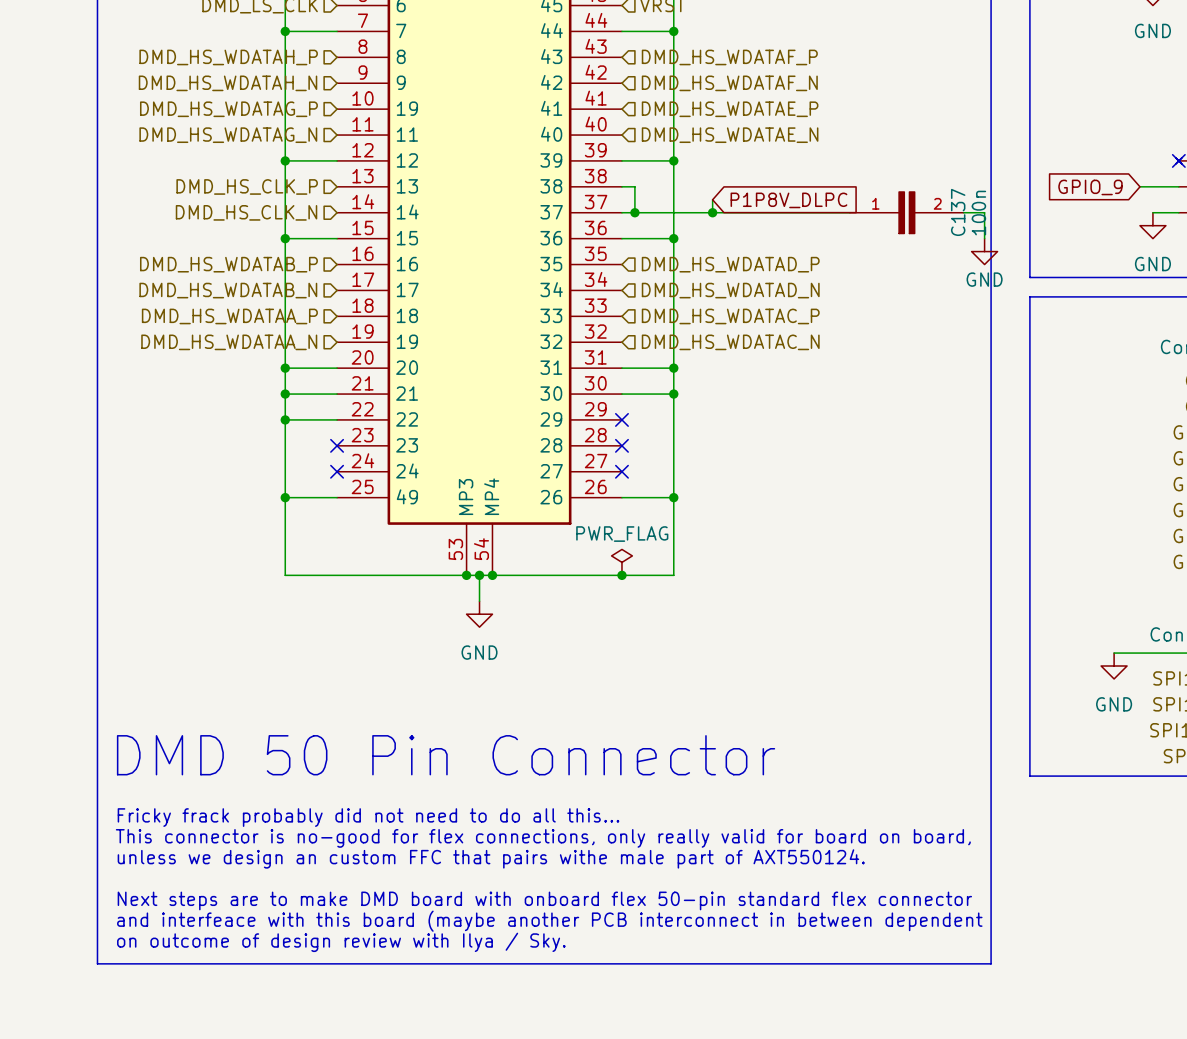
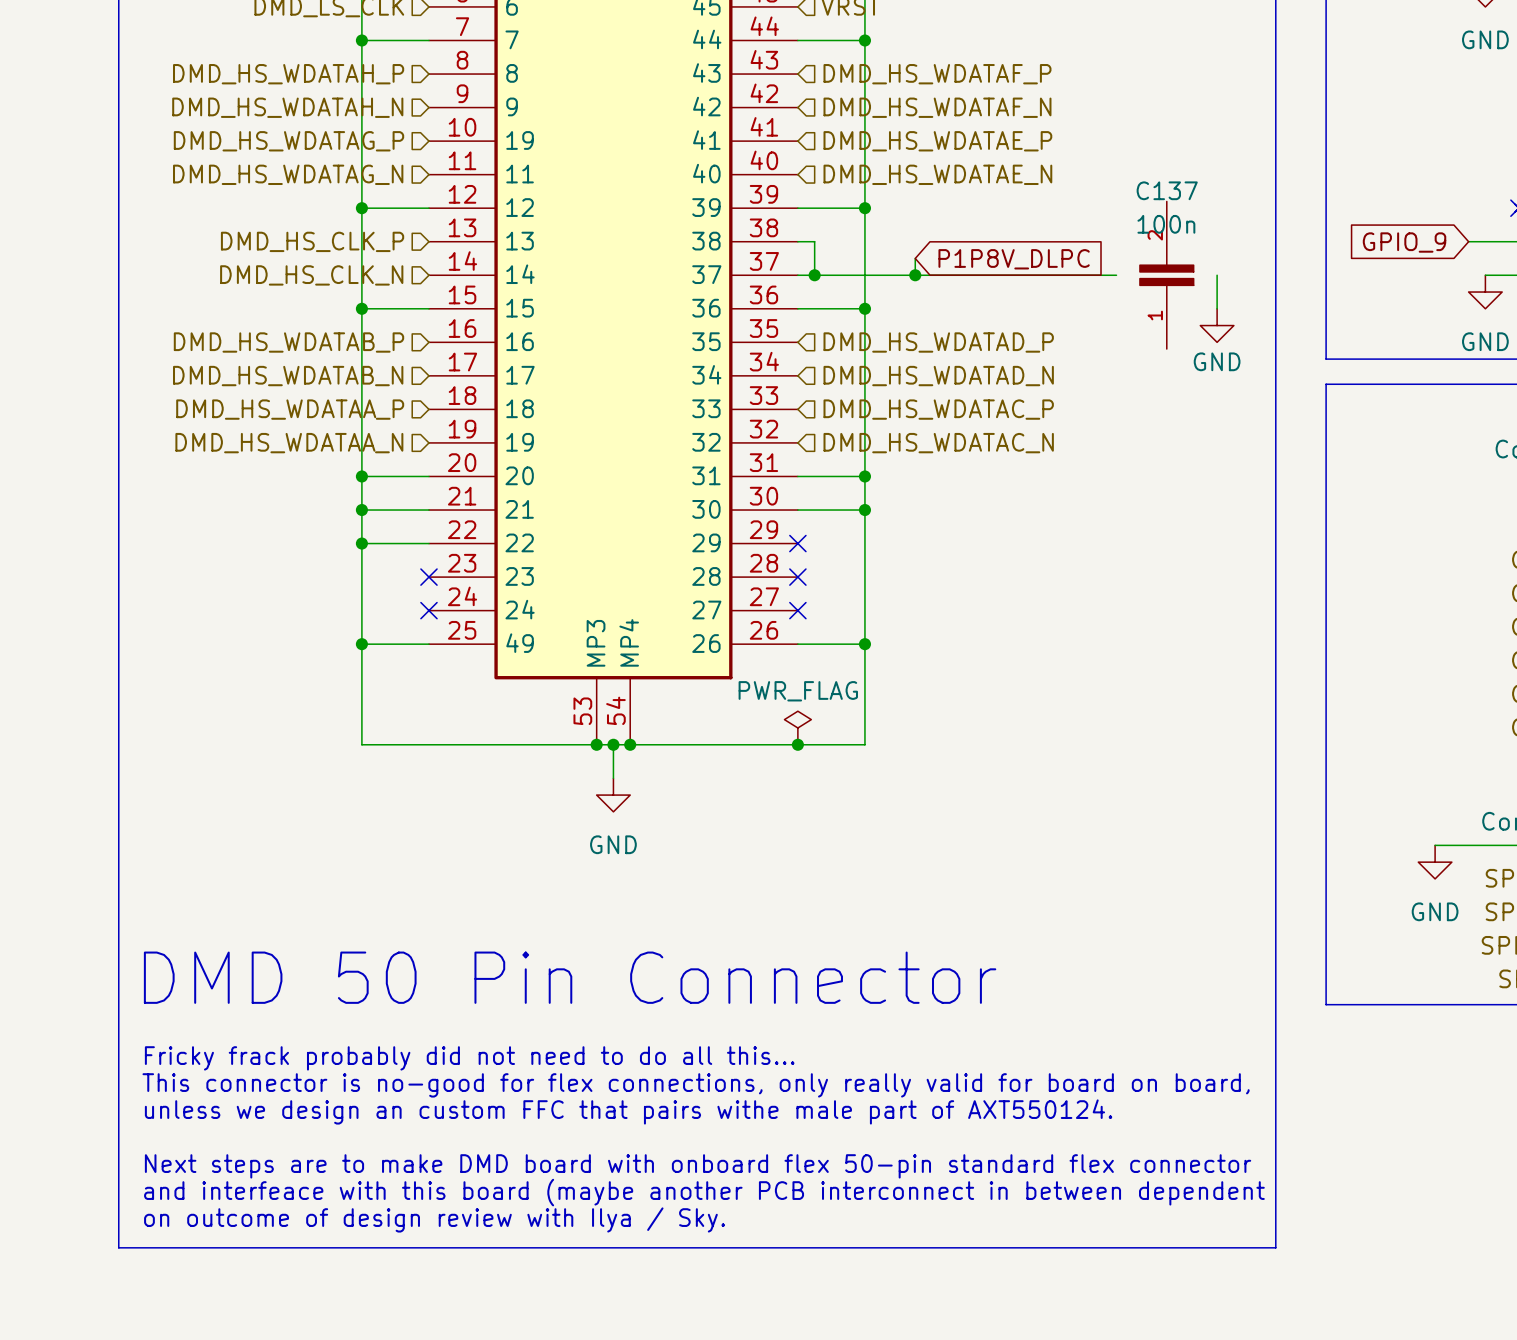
C137 rotation: 0° (906, 212) -> 90° counterclockwise (1166, 275)
wire: none -> (1217, 275) (1217, 308)
wire: (963, 212) (984, 212) (984, 238) -> none
C137 value position: 100n (978, 213) -> 100n (1166, 224)
power symbol position: GND (984, 251) -> GND (1217, 325)

